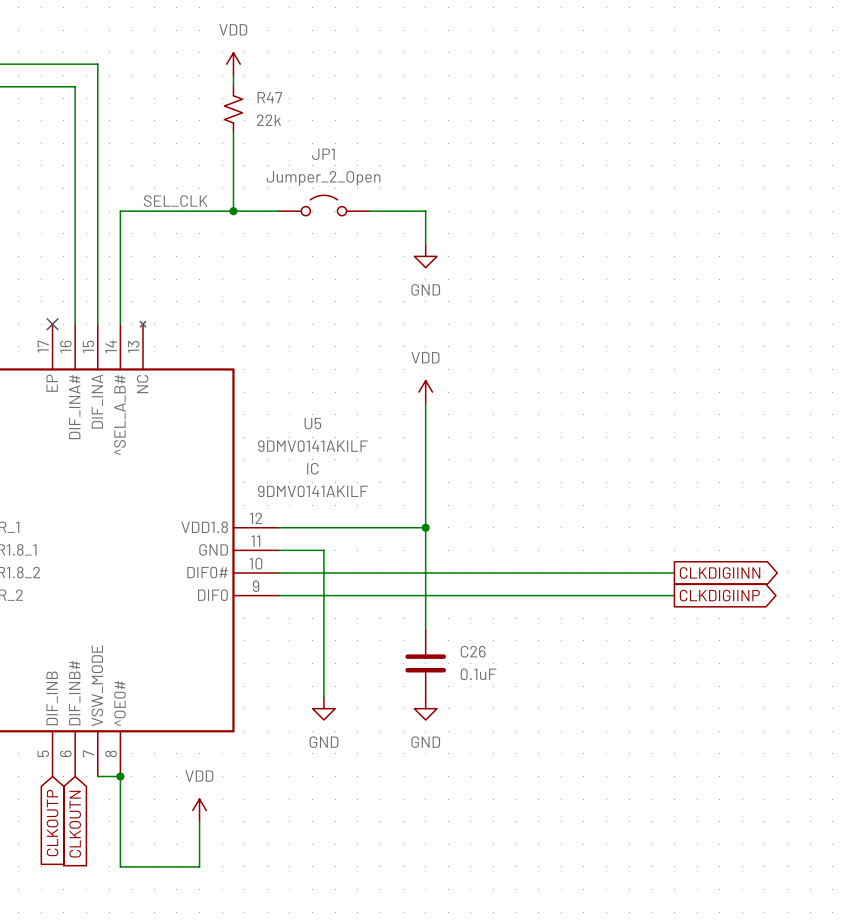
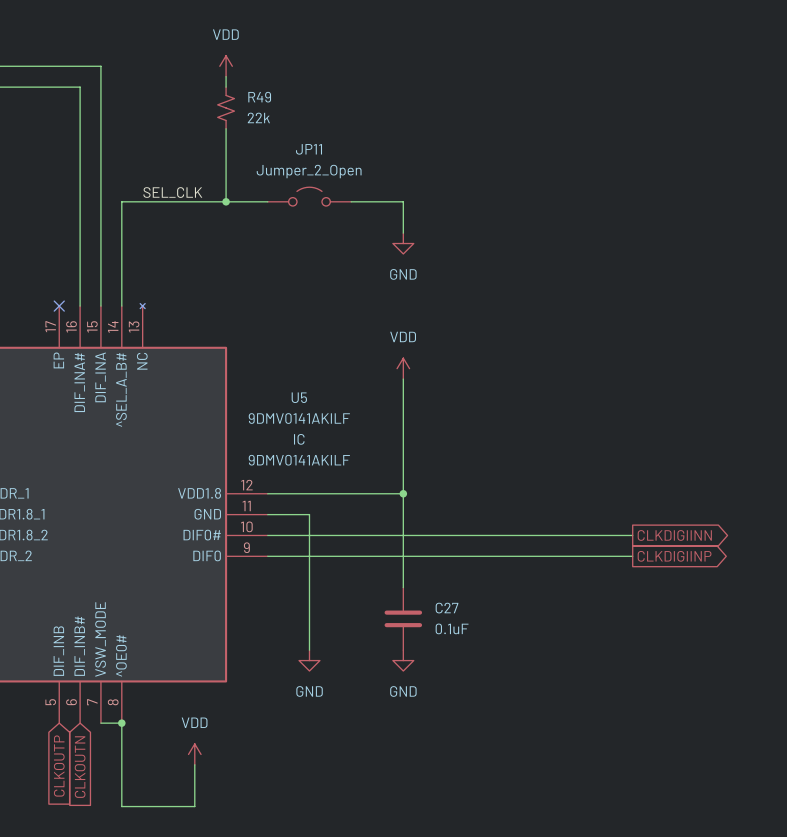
R47 name: R47 (269, 97) -> R49 (259, 97)
JP1 name: JP1 (323, 154) -> JP11 (309, 149)
C26 name: C26 (473, 651) -> C27 (447, 608)

